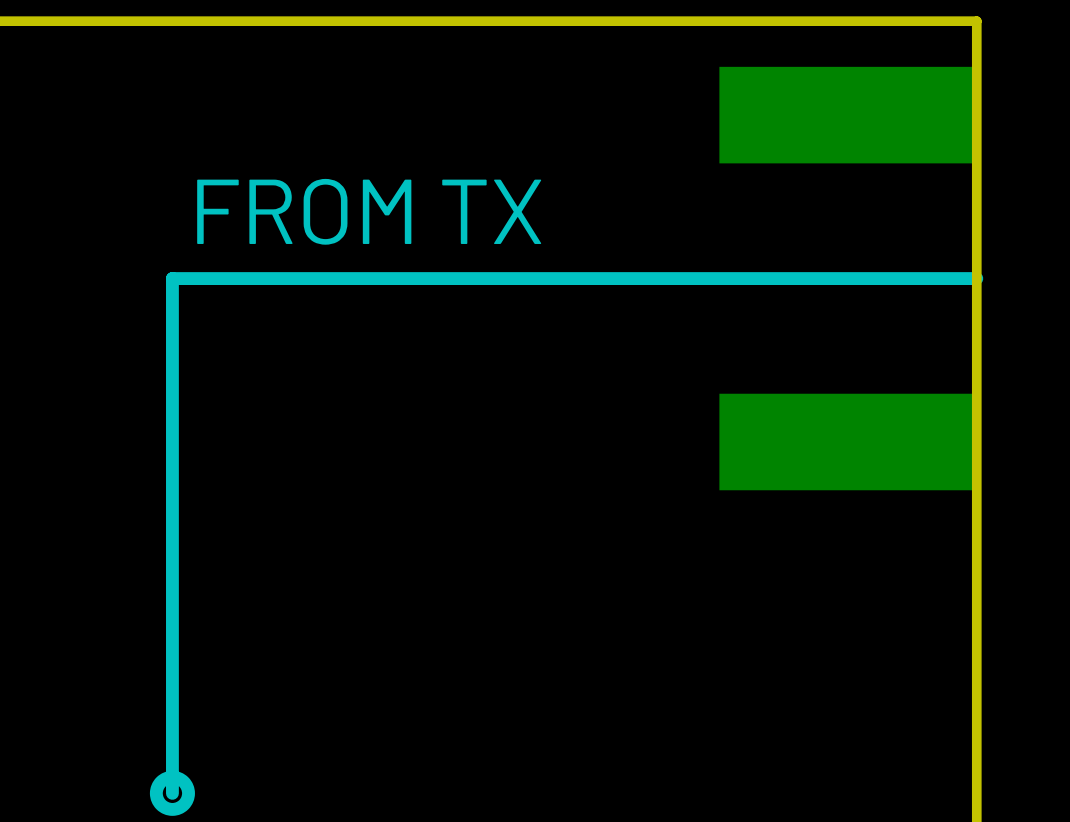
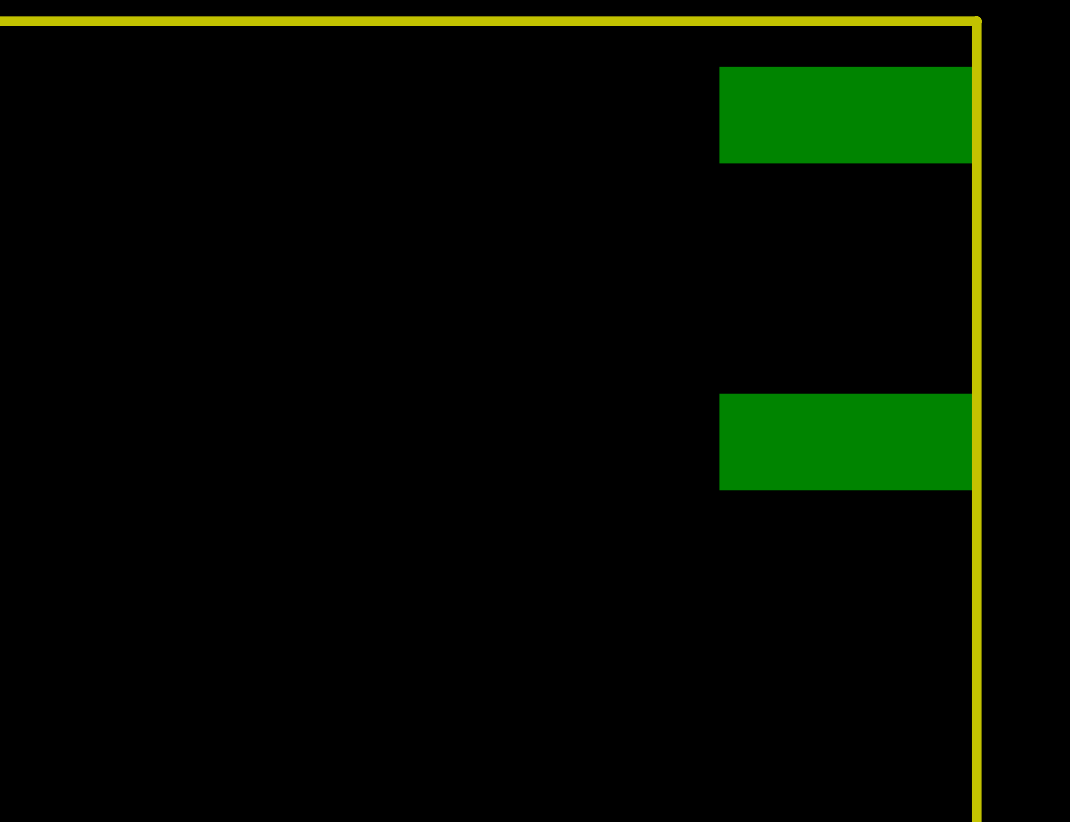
text: FROM TX (369, 211) -> none
line: (976, 278) (172, 278) (172, 793) -> none
drawing: [149, 770, 195, 816] -> none

